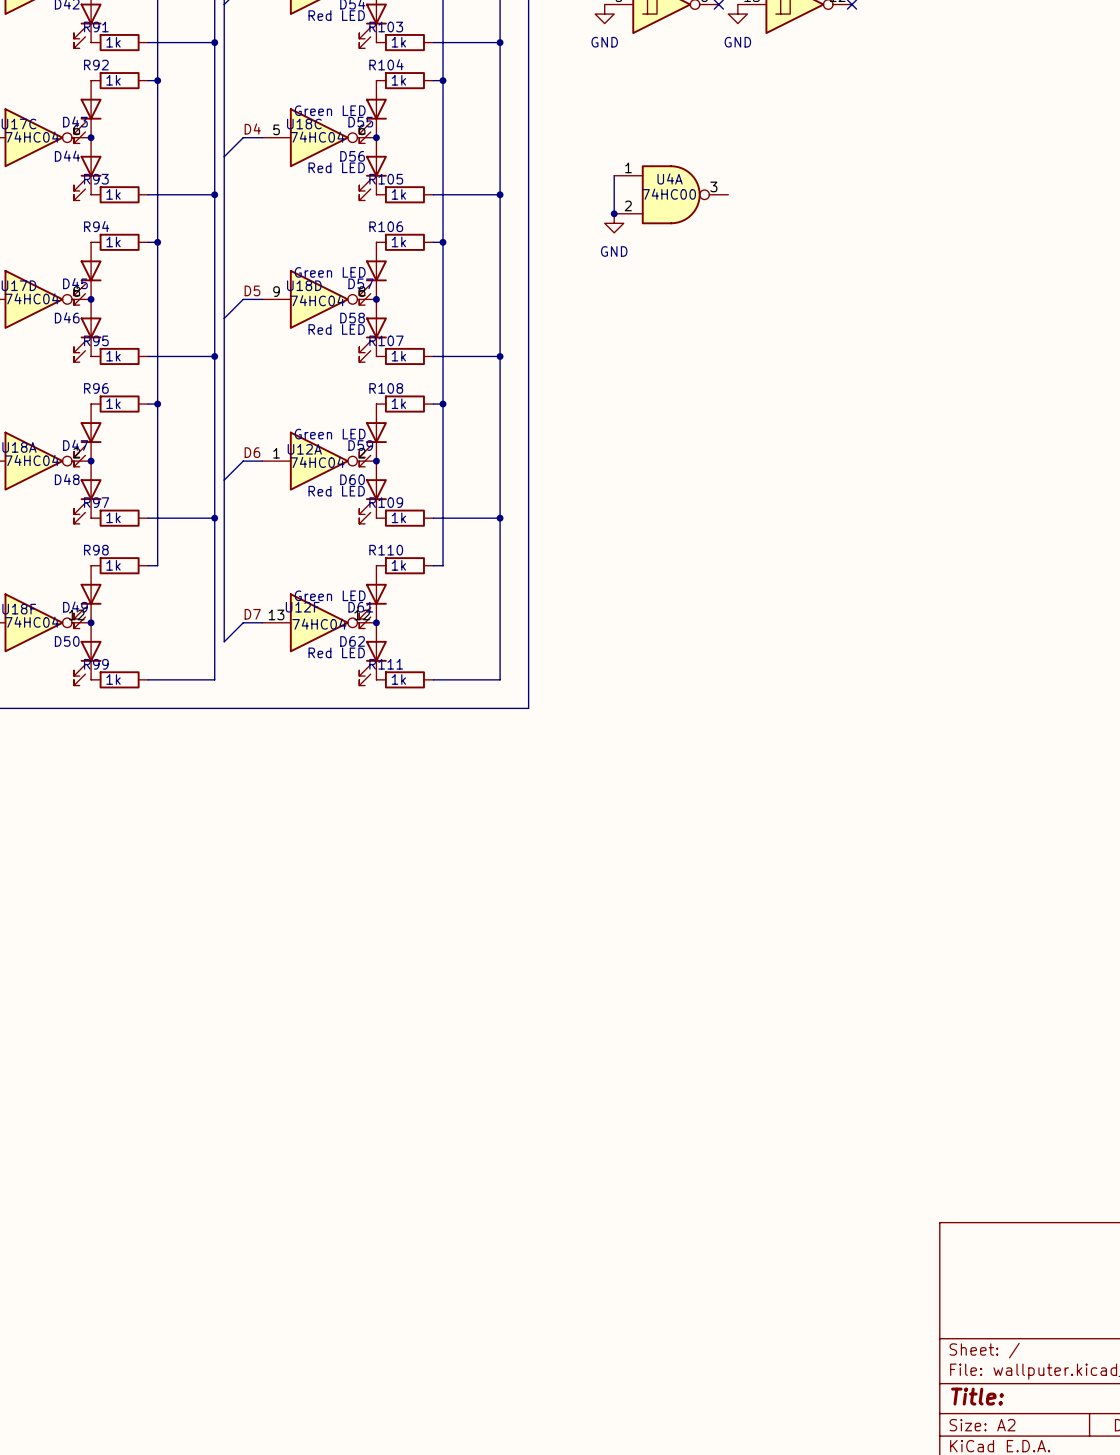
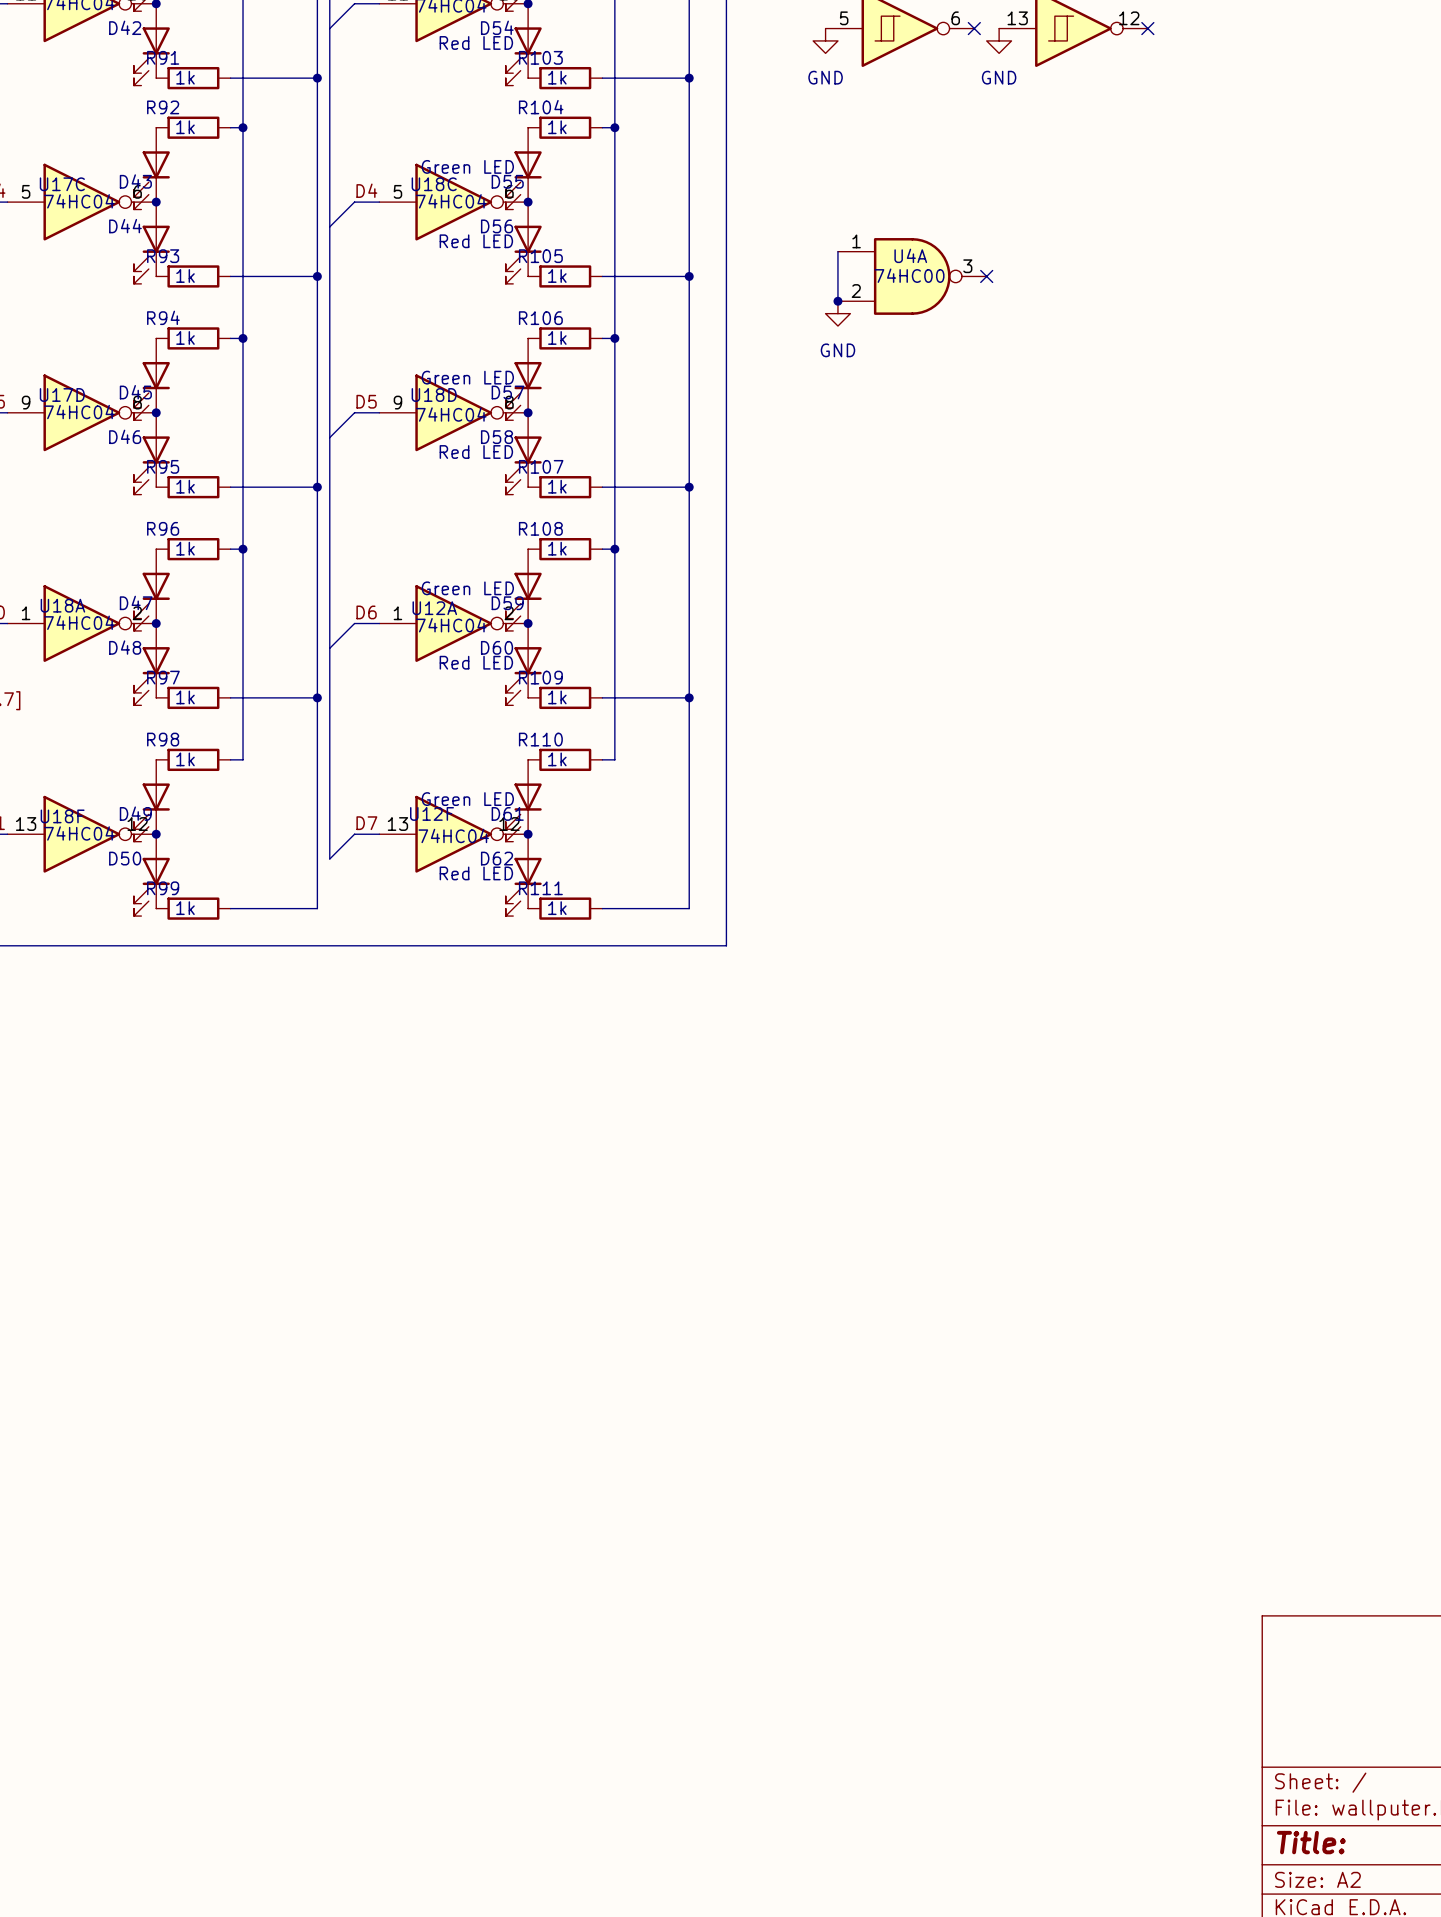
no-connect mark: none -> (986, 276)

